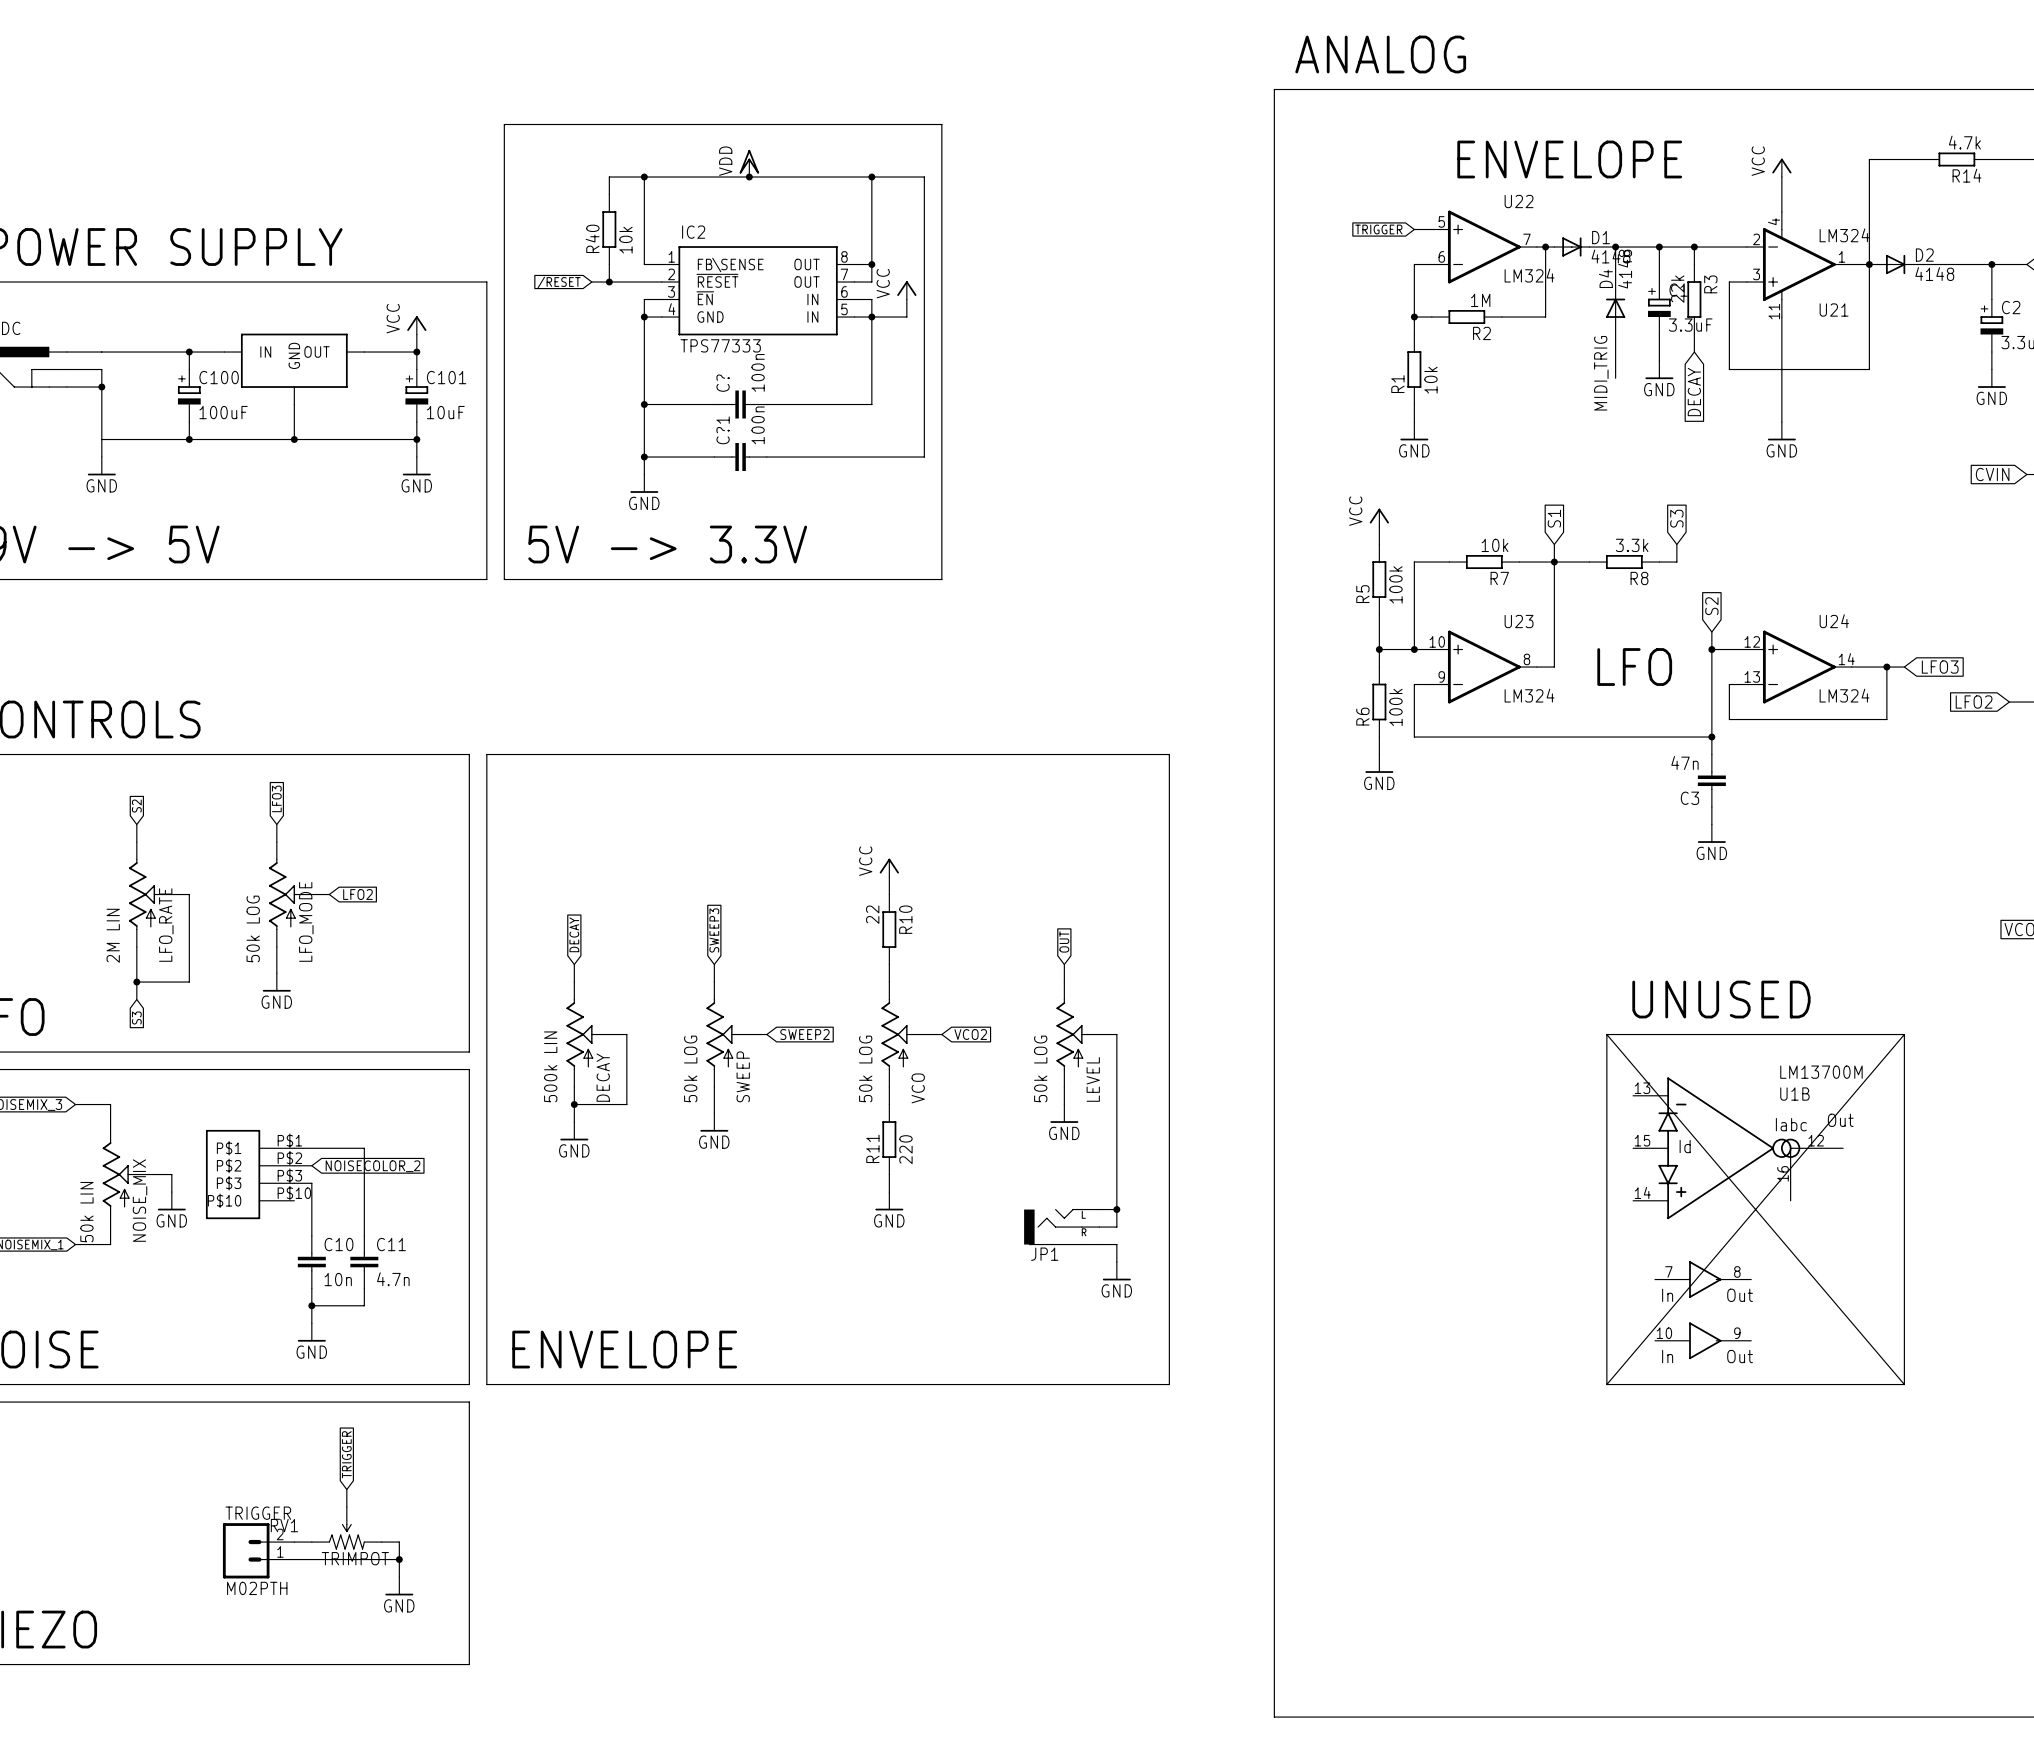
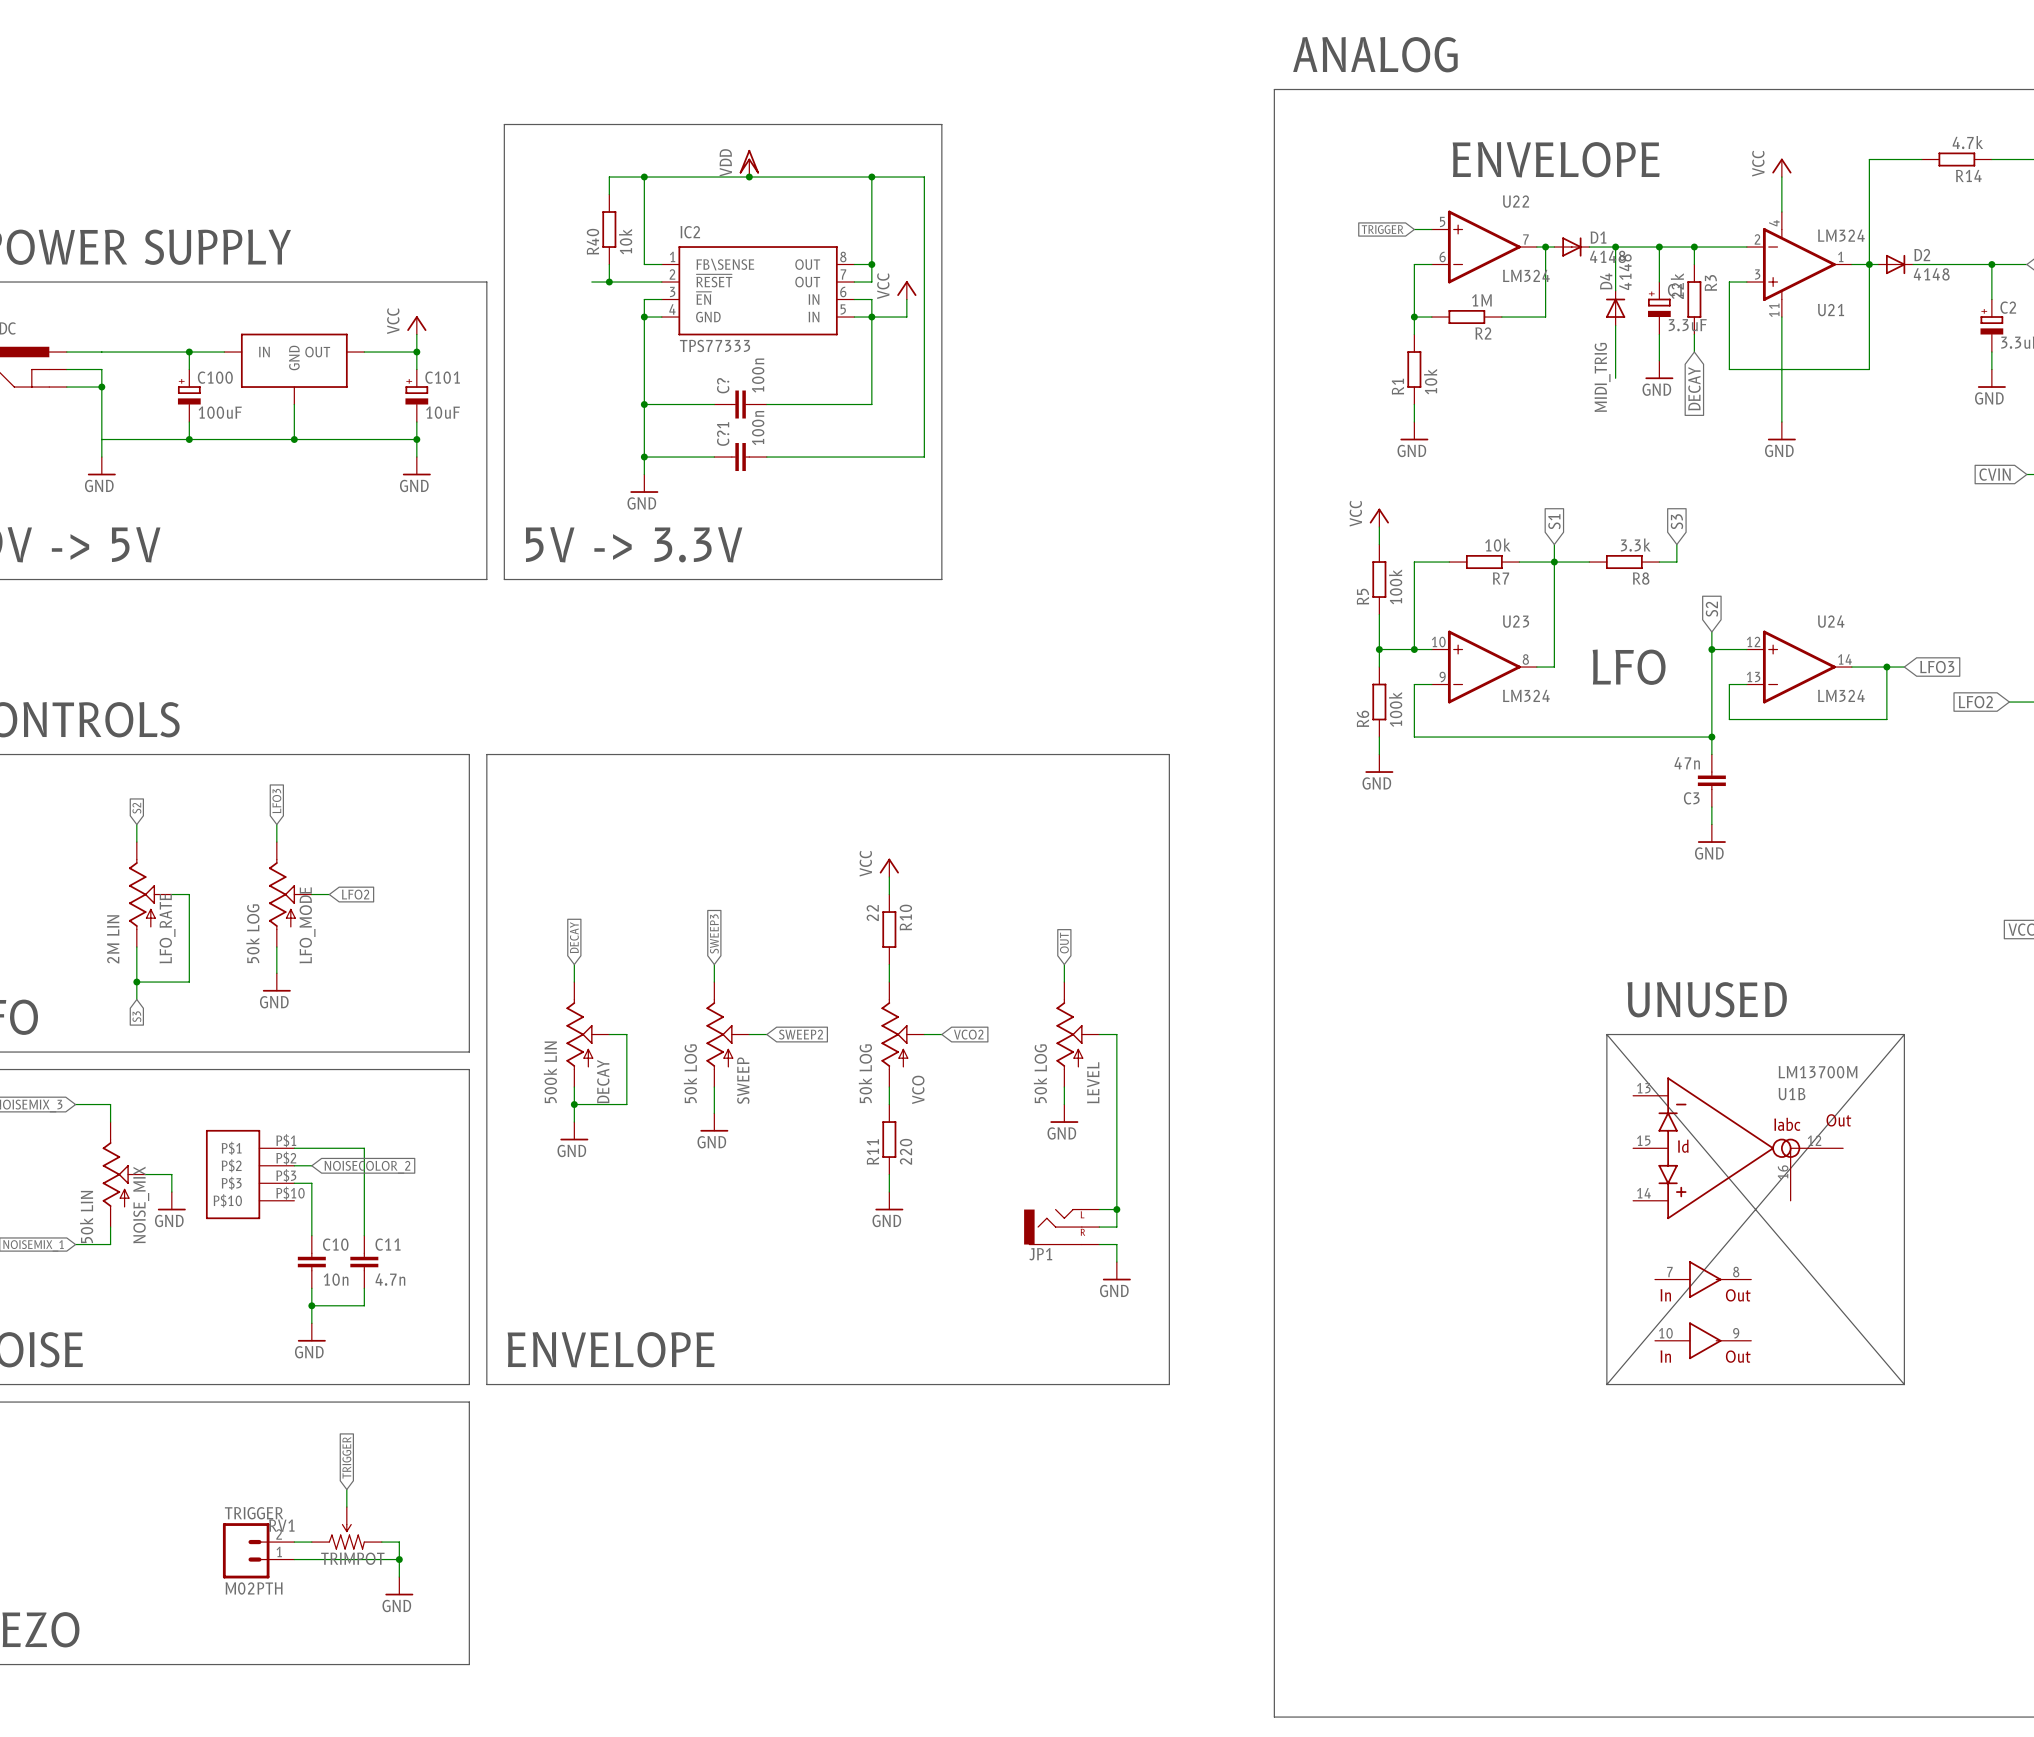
global label: /RESET (558, 282) -> none

